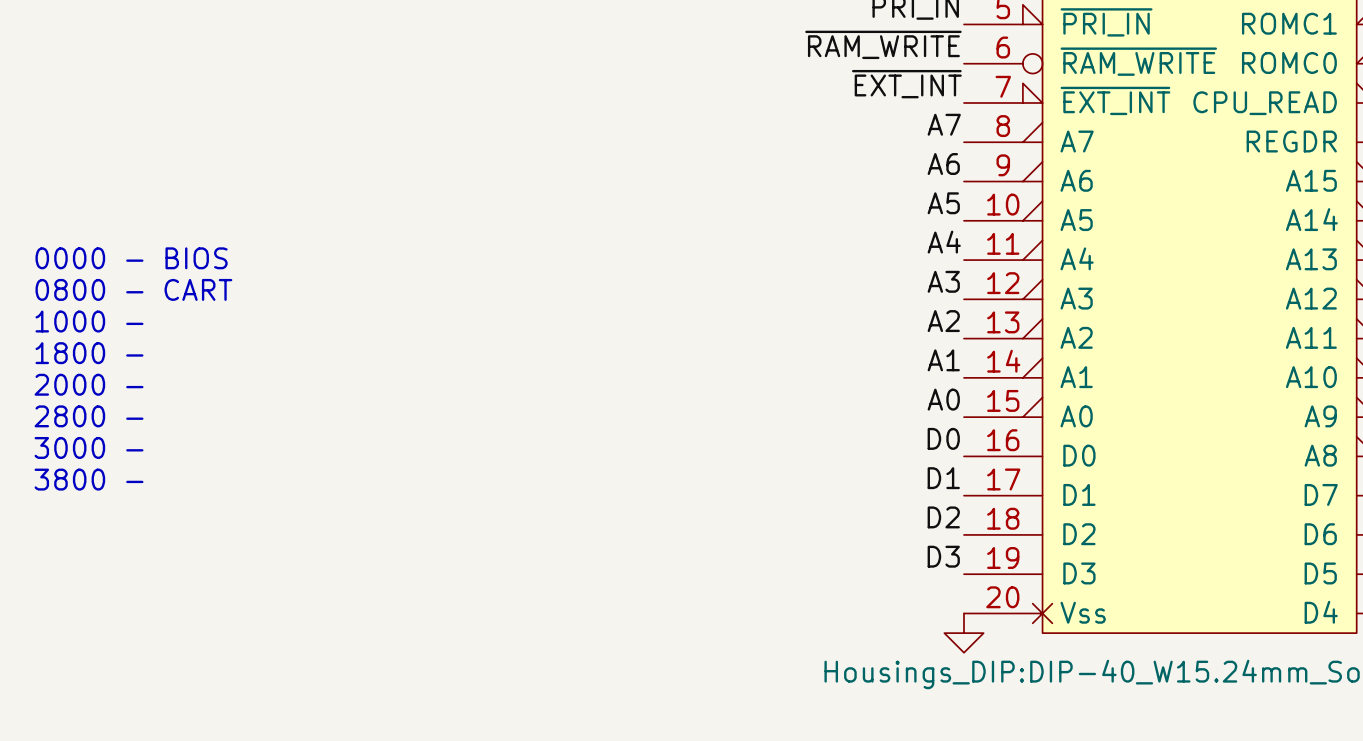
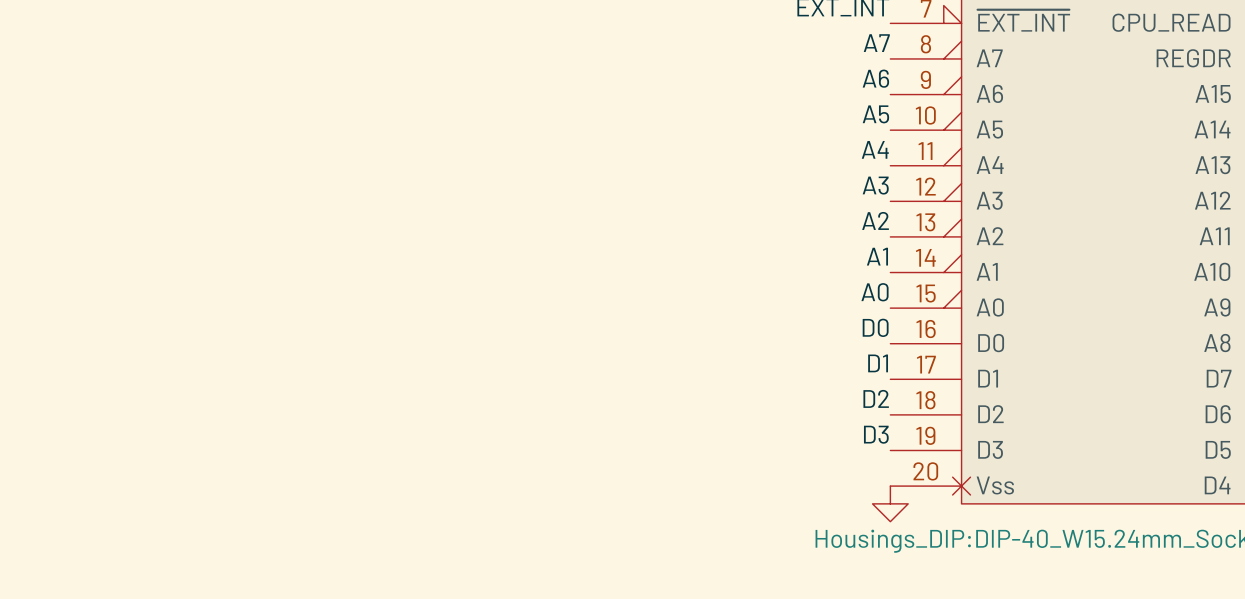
text: 0000 - BIOS (131, 258) -> none
text: 0800 - CART (133, 289) -> none
text: 1000 - (89, 321) -> none
text: 1800 - (89, 353) -> none
text: 2000 - (89, 384) -> none
text: 2800 - (89, 416) -> none
text: 3000 - (89, 447) -> none
text: 3800 - (89, 479) -> none

